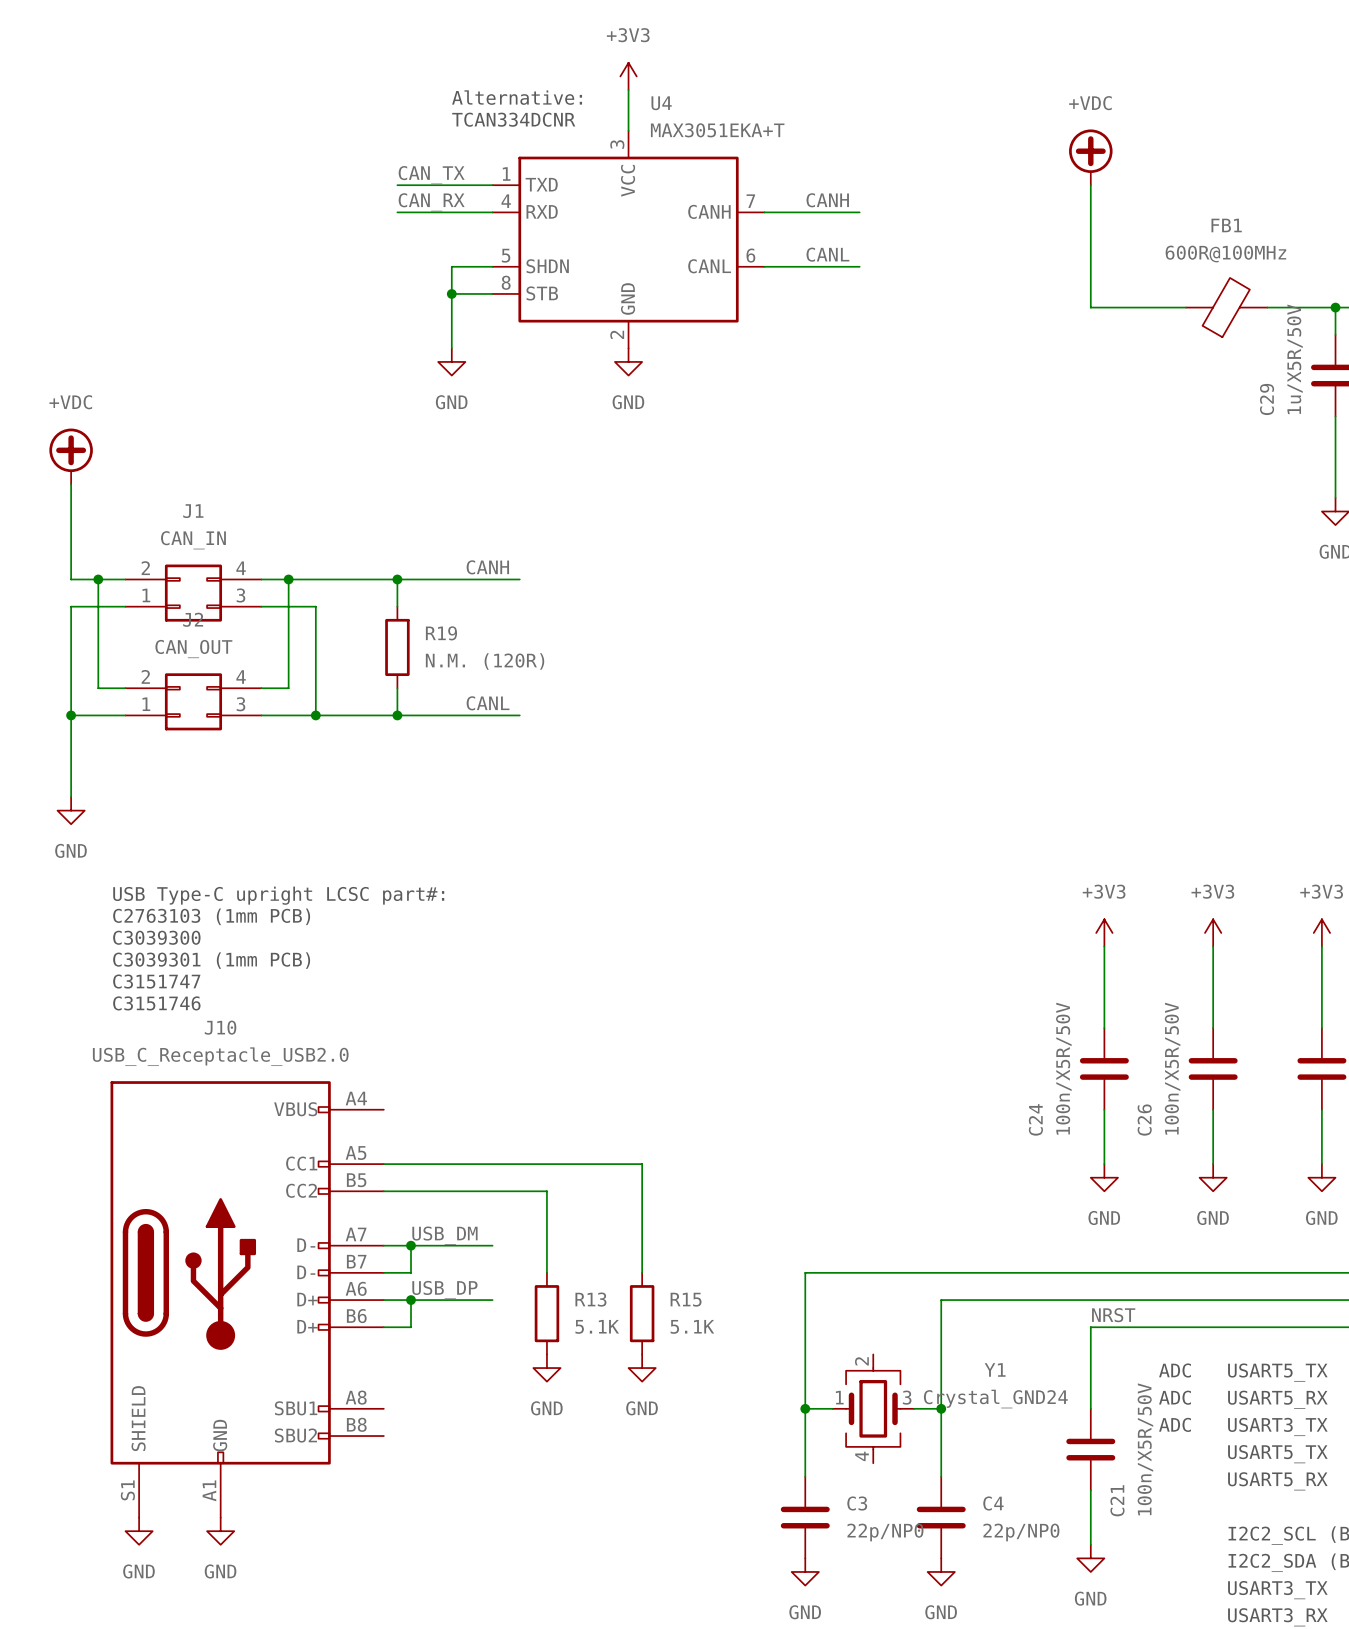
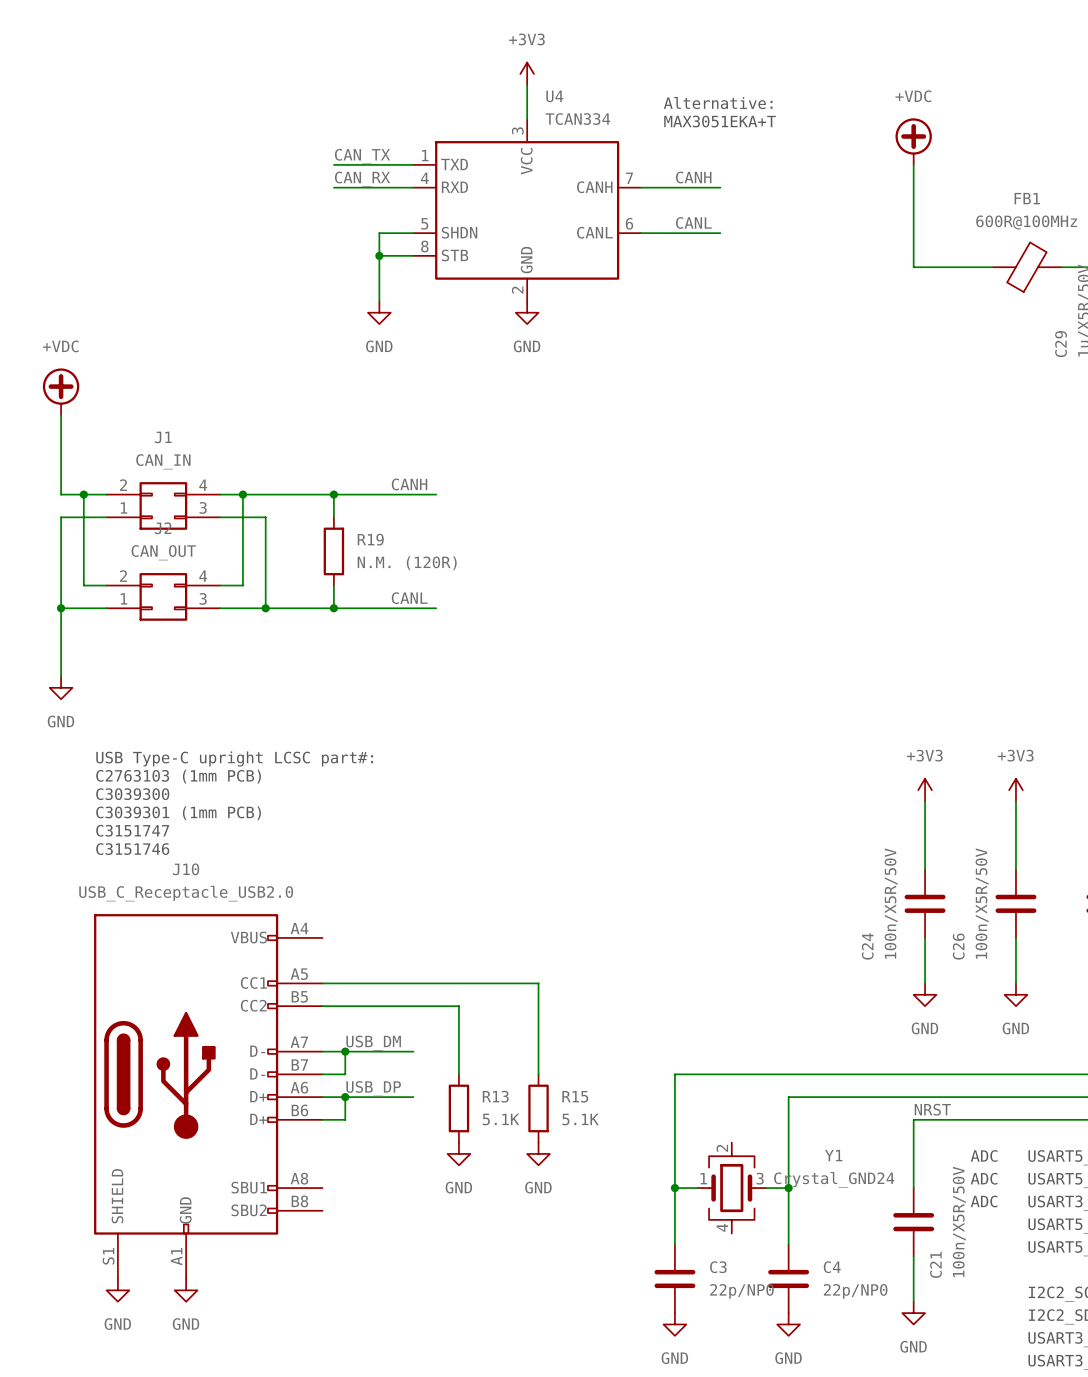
text: Alternative: (517, 97) -> none
text: none -> Alternative: (718, 103)
text: TCAN334DCNR (513, 119) -> none
U4 value: MAX3051EKA+T (717, 130) -> TCAN334 (577, 119)
text: none -> MAX3051EKA+T (720, 121)

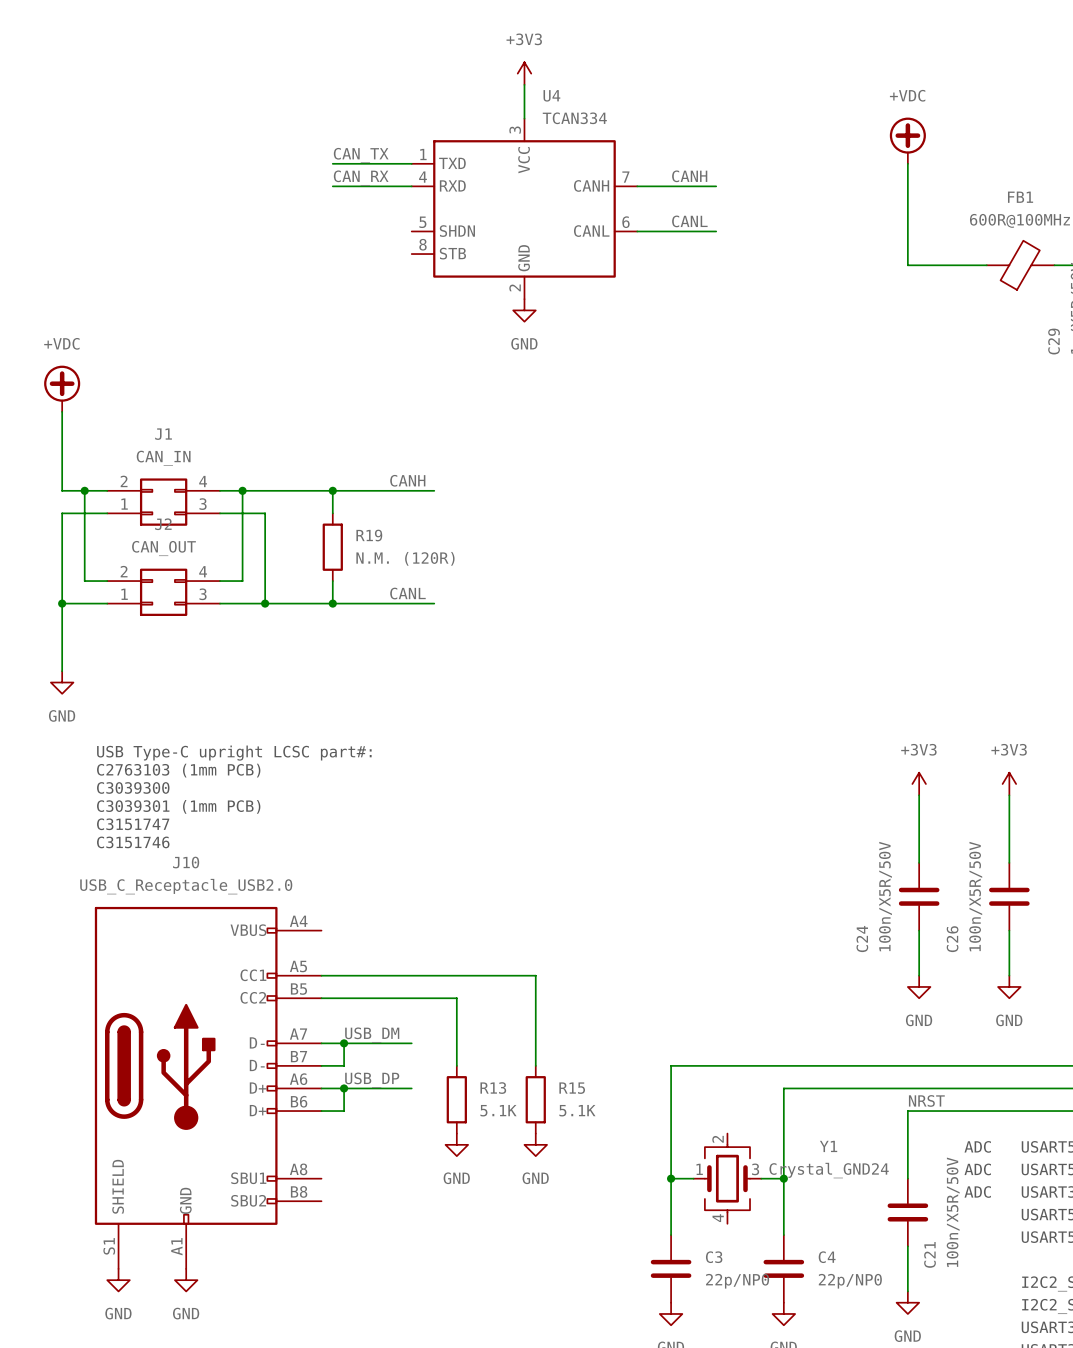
text: Alternative: (718, 103) -> none
text: MAX3051EKA+T (720, 121) -> none
wire: (413, 233) (379, 233) (379, 301) -> none
wire: (379, 255) (413, 255) -> none
junction: (379, 255) -> none
power symbol: GND (379, 312) -> none

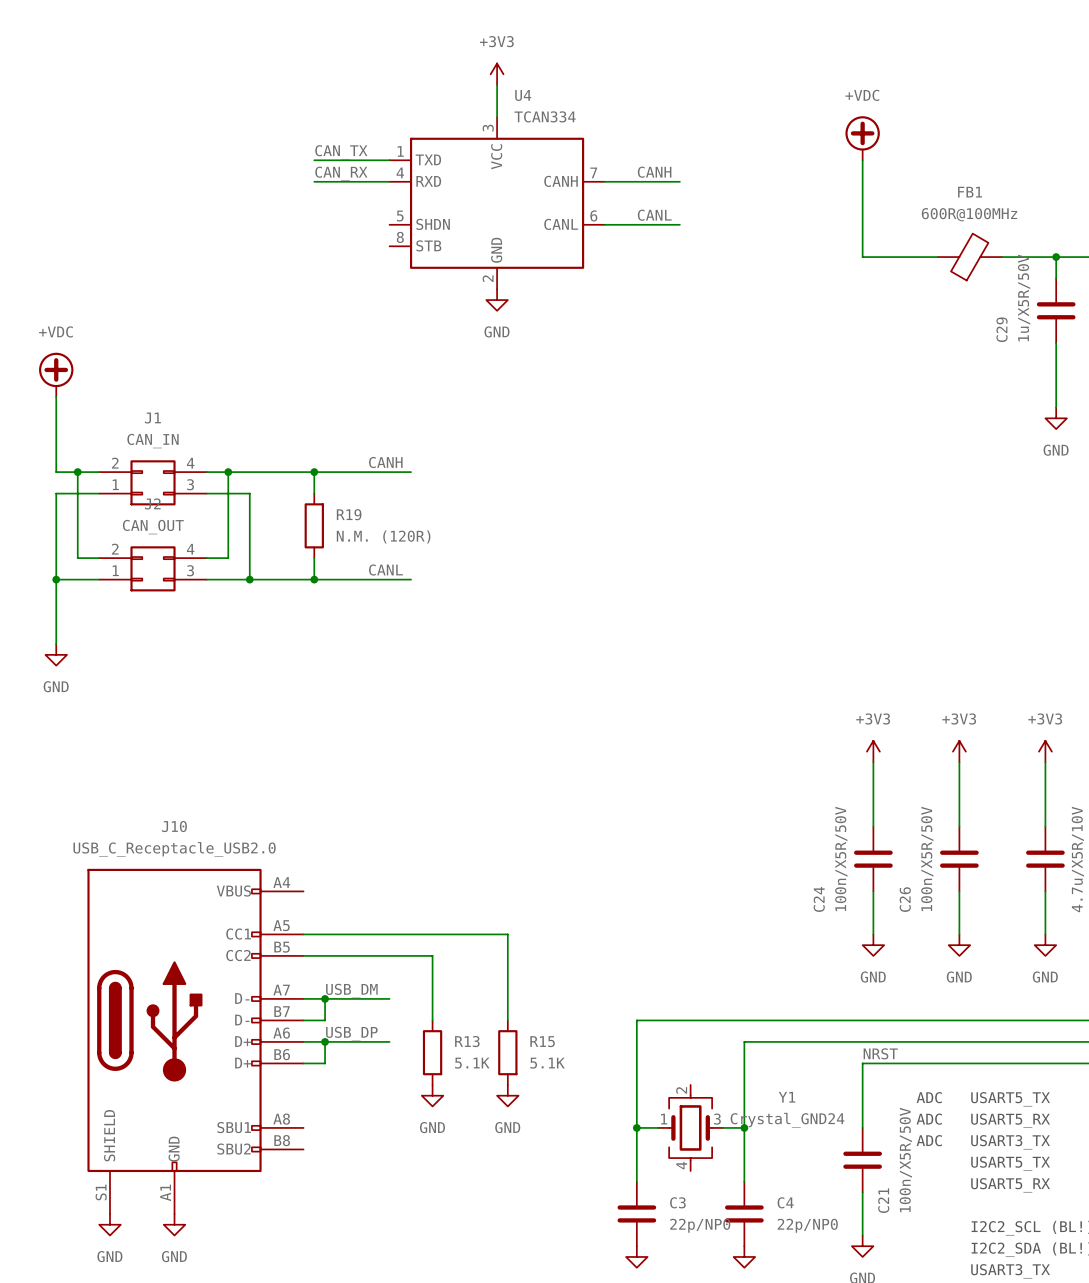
text: USB Type-C upright LCSC part#: (234, 753) -> none
text: C2763103 (1mm PCB) (178, 770) -> none
text: C3039300 (133, 787) -> none
text: C3039301 (1mm PCB) (178, 806) -> none
text: C3151747 (133, 824) -> none
text: C3151746 (133, 842) -> none

